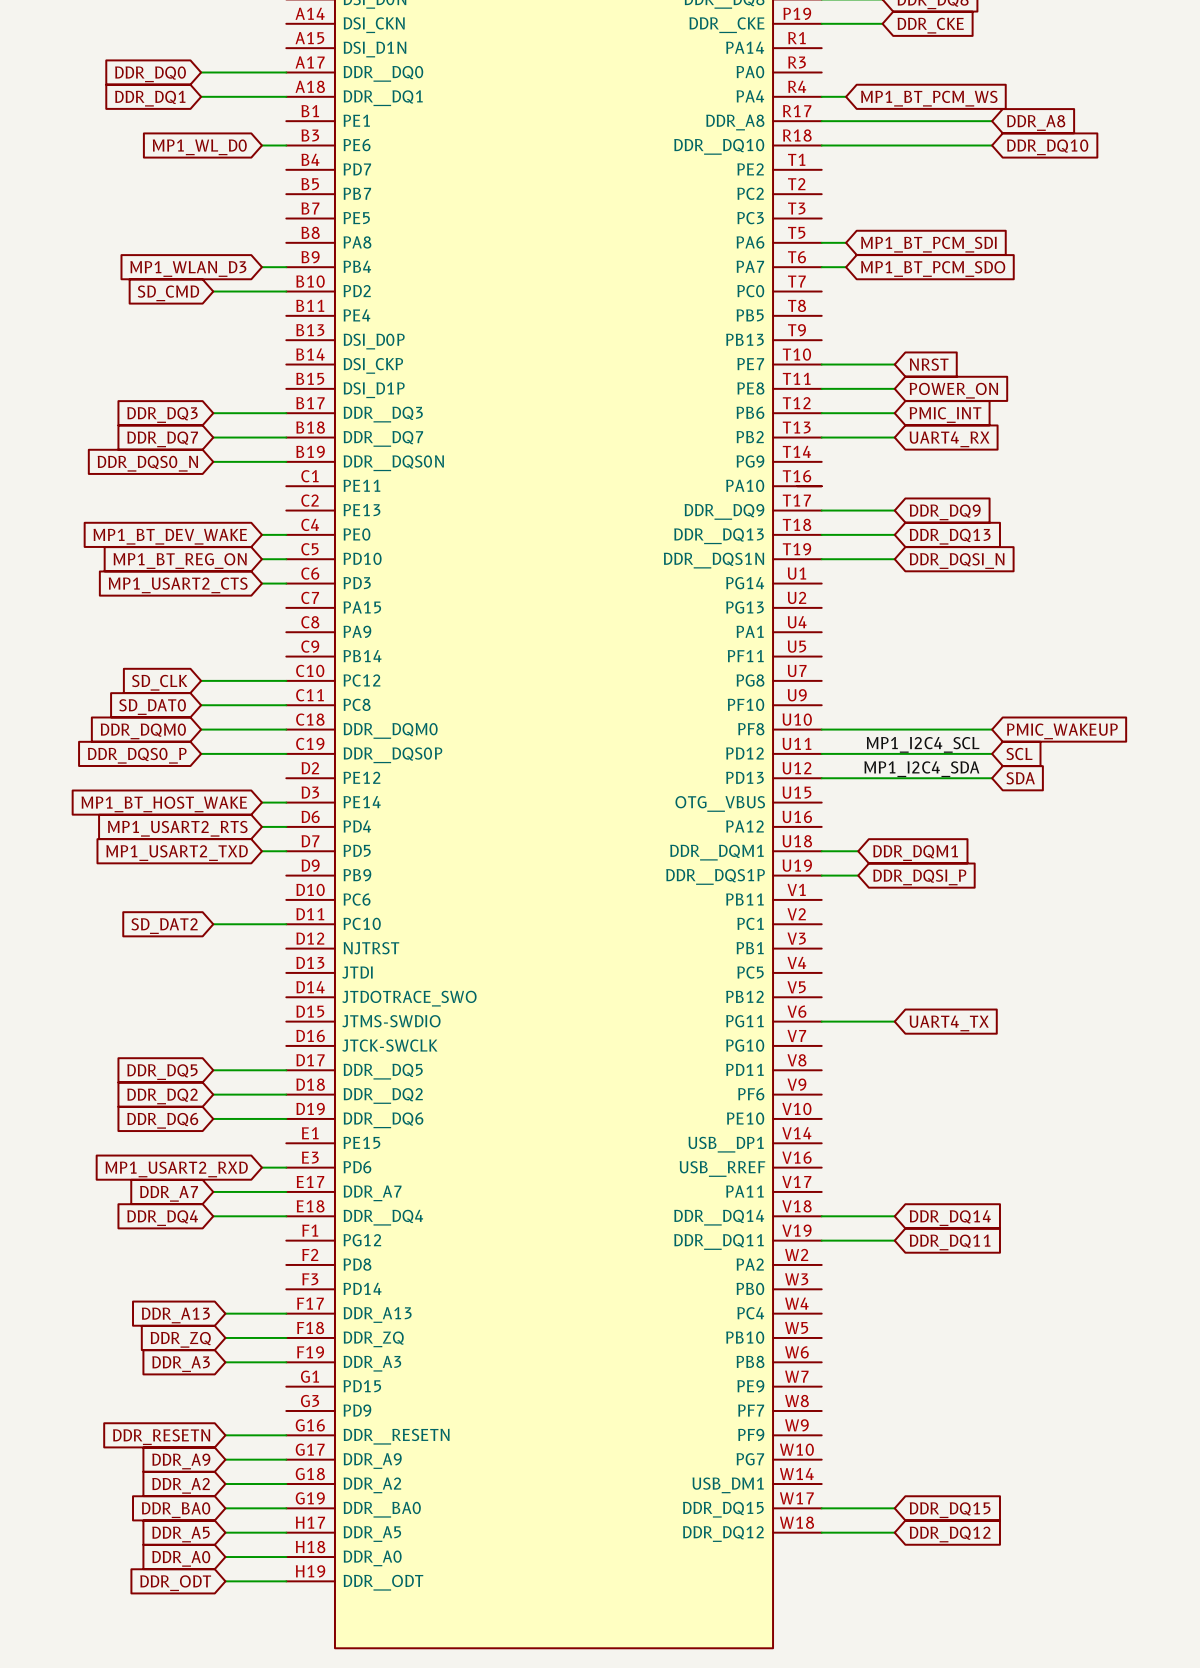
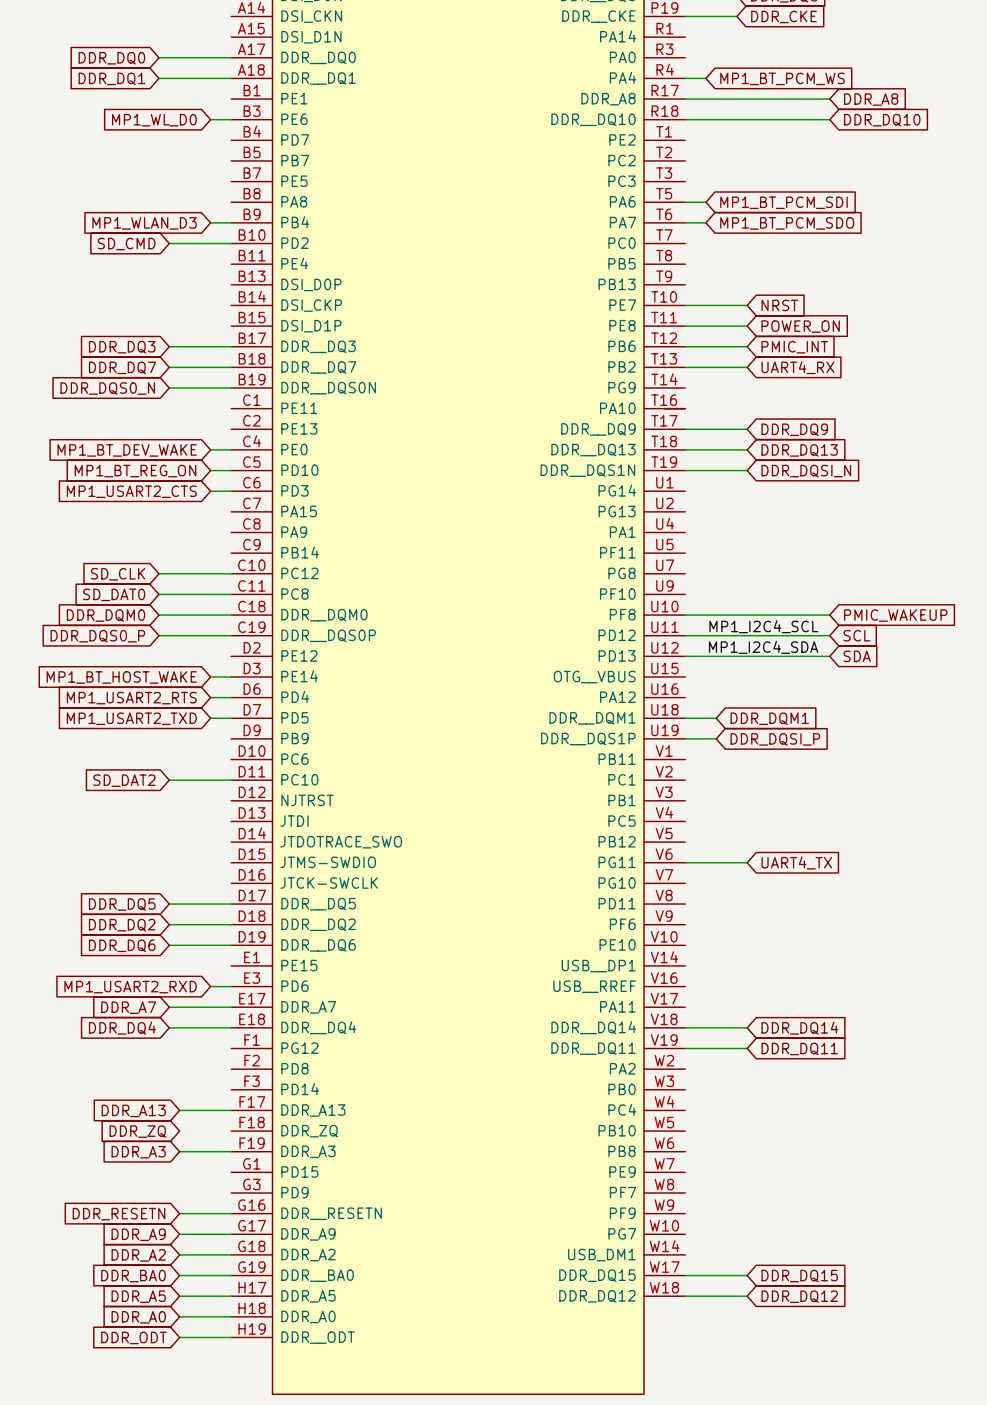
wire: (225, 1337) (286, 1337) -> none

